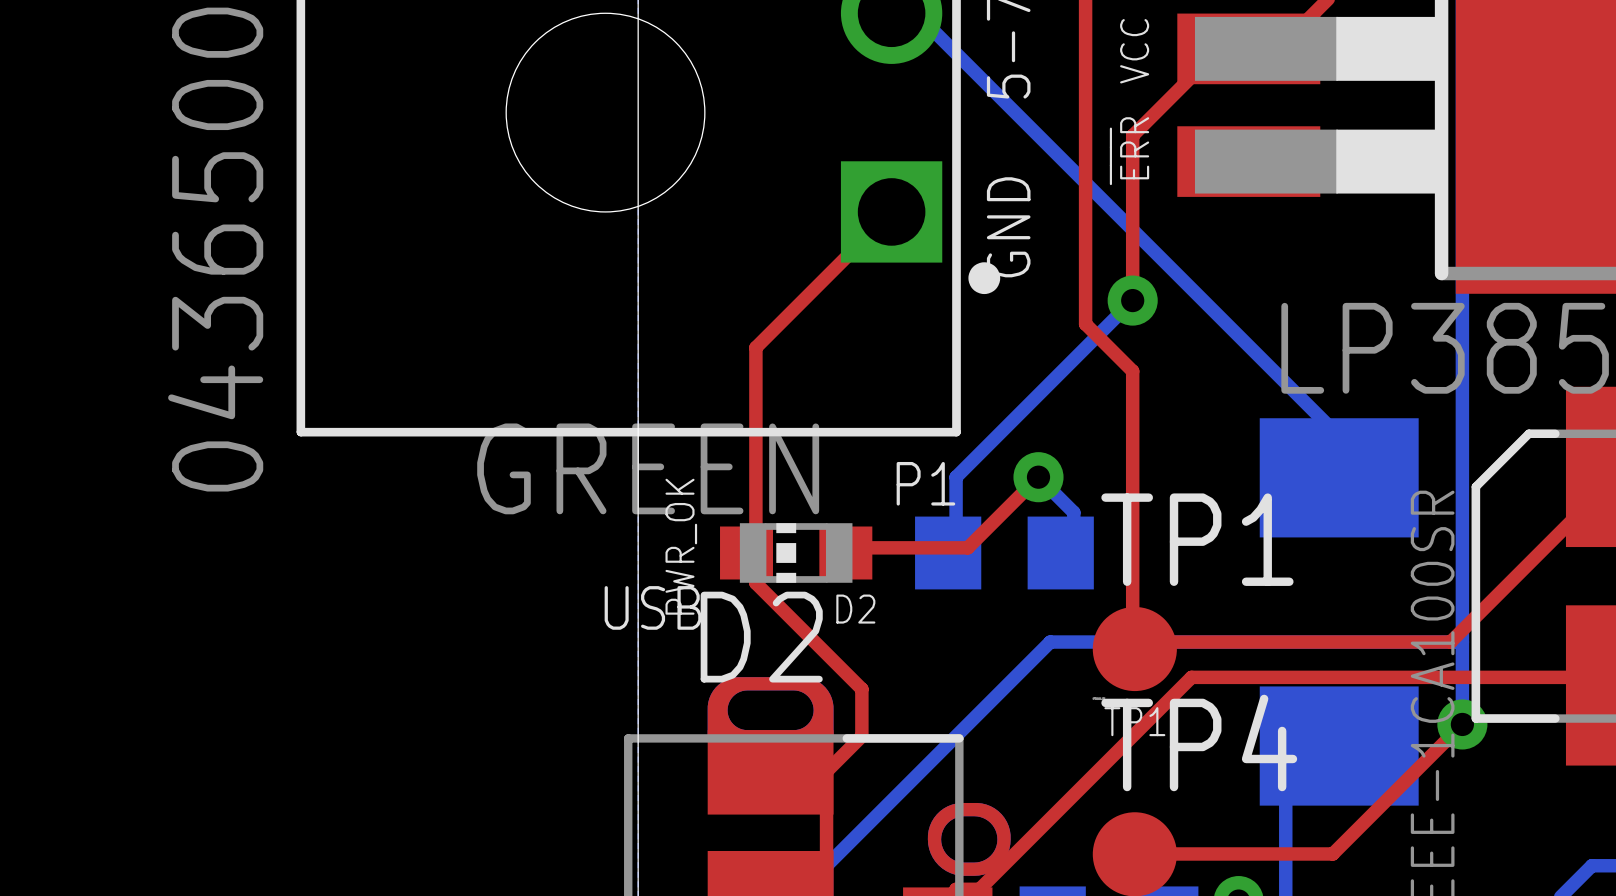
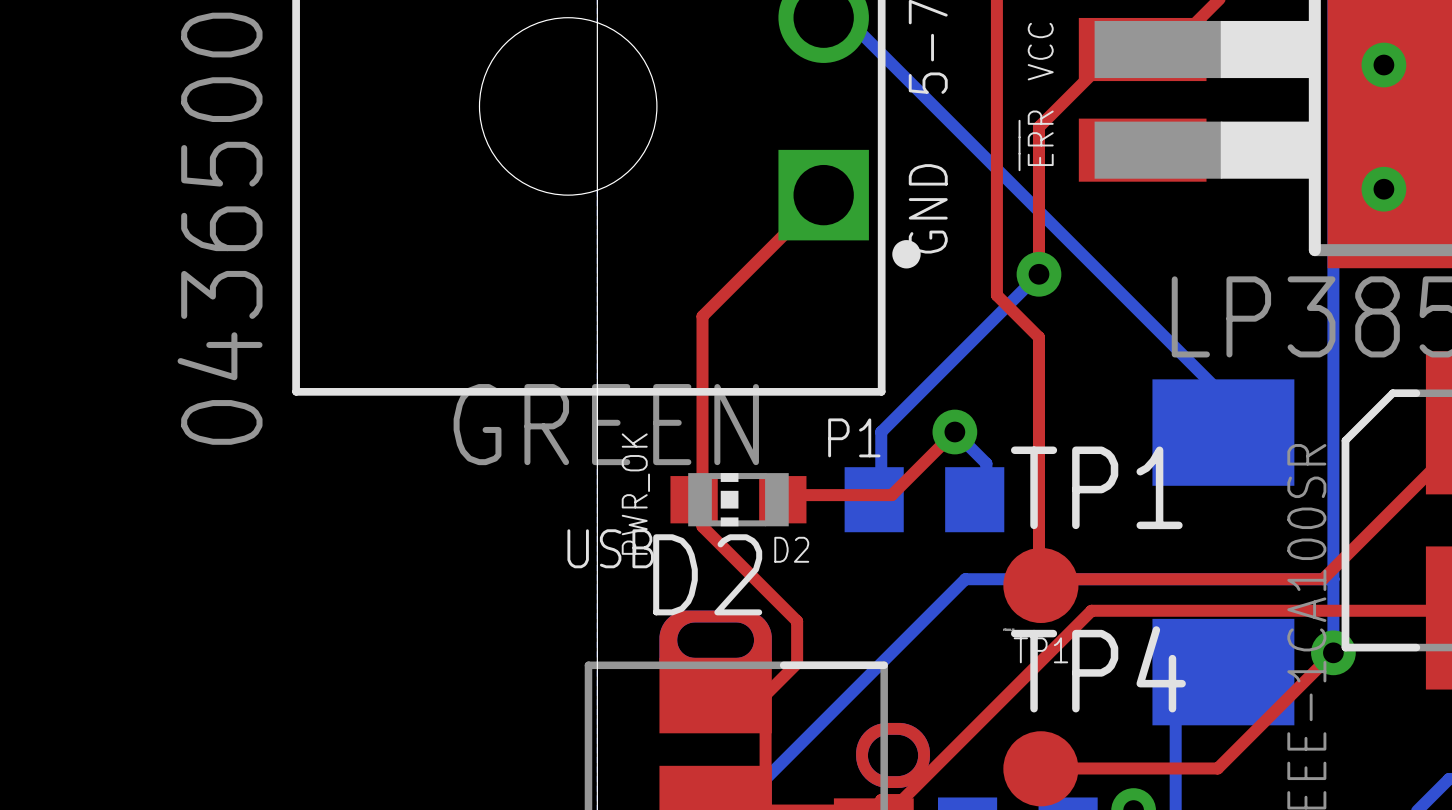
via: none -> (1383, 65)
via: none -> (1383, 189)

